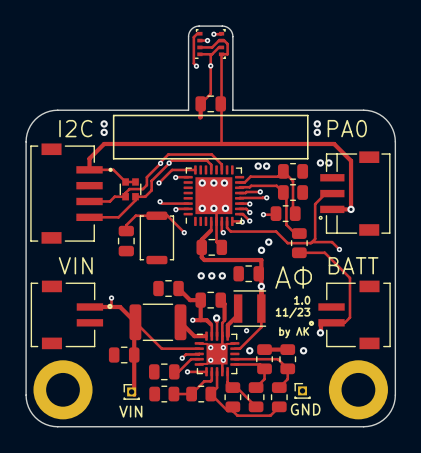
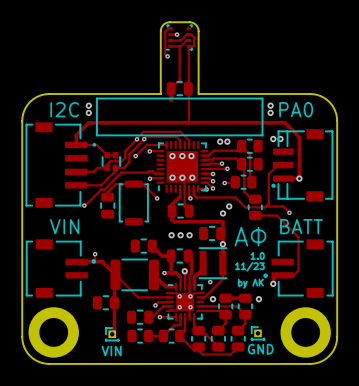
track: (221, 33) (213, 34) -> none
via: (213, 34) -> none
via: (210, 65) -> none
track: (160, 201) (161, 203) (182, 203) -> (84, 205) (121, 172) (153, 171) (155, 173)
via: (160, 201) -> none
via: none -> (84, 205)

